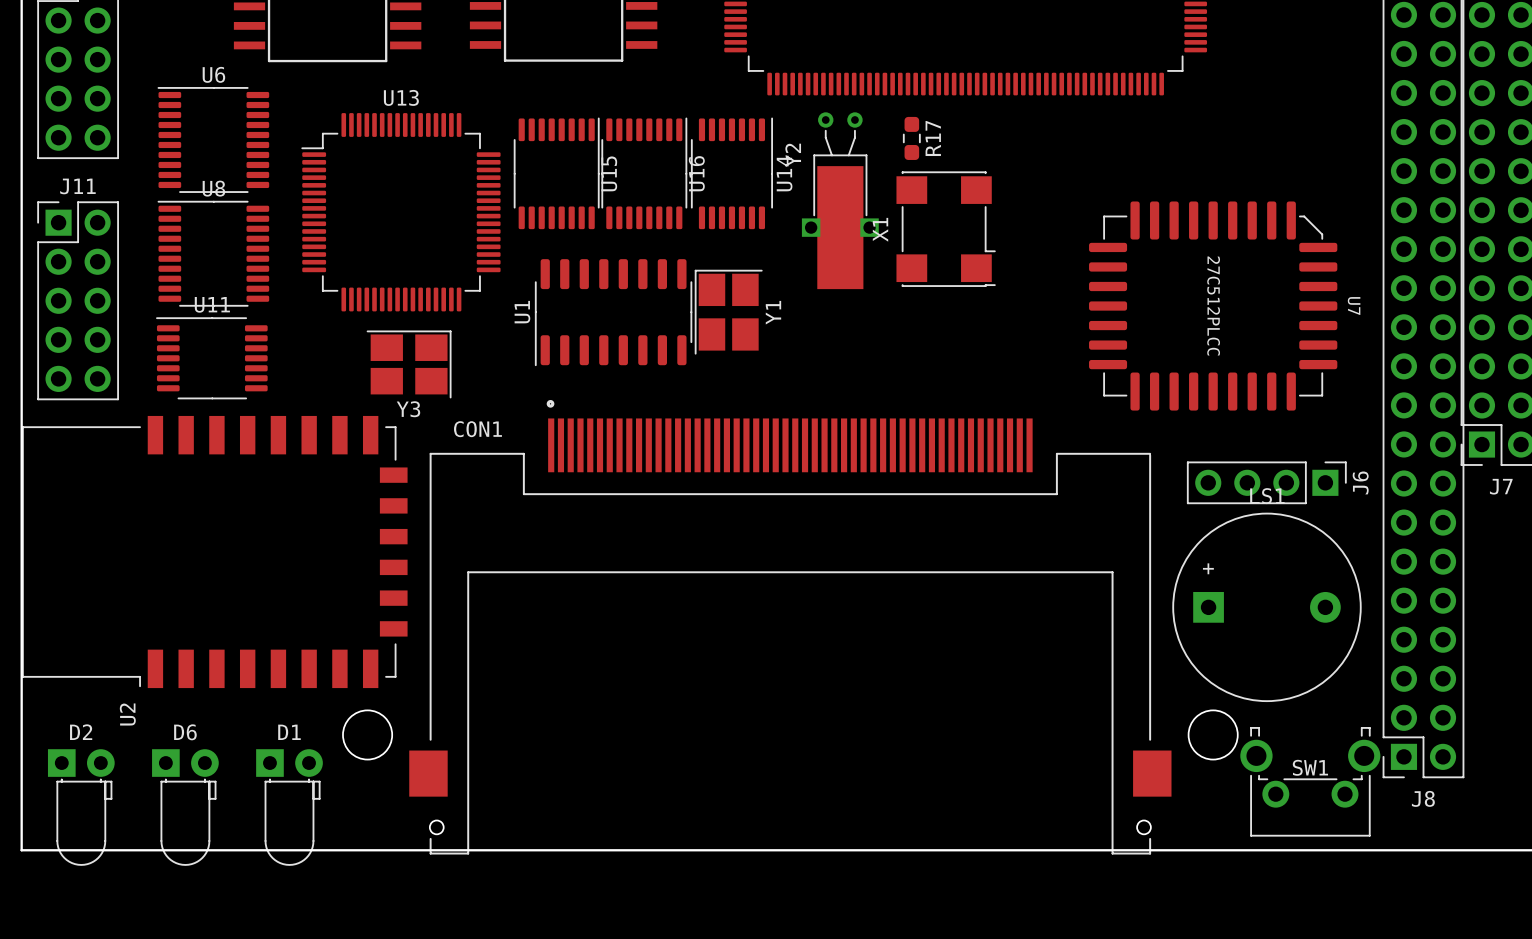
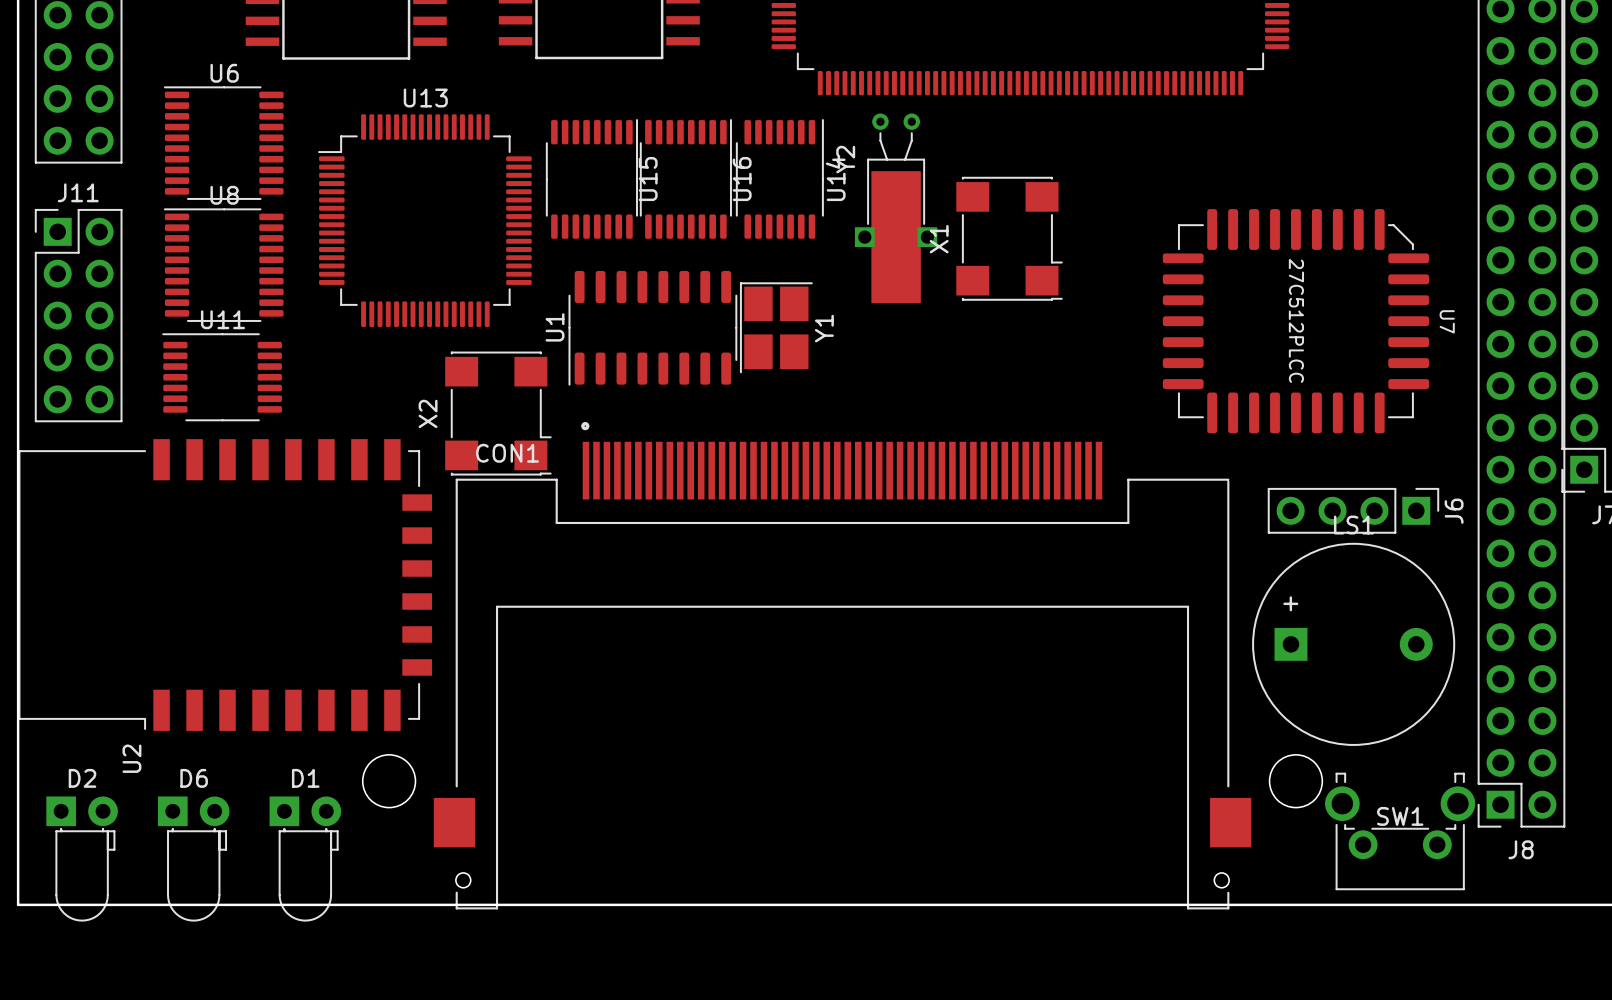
R17: (911, 138) -> none
Y3: (409, 364) -> none
X2: none -> (498, 413)

